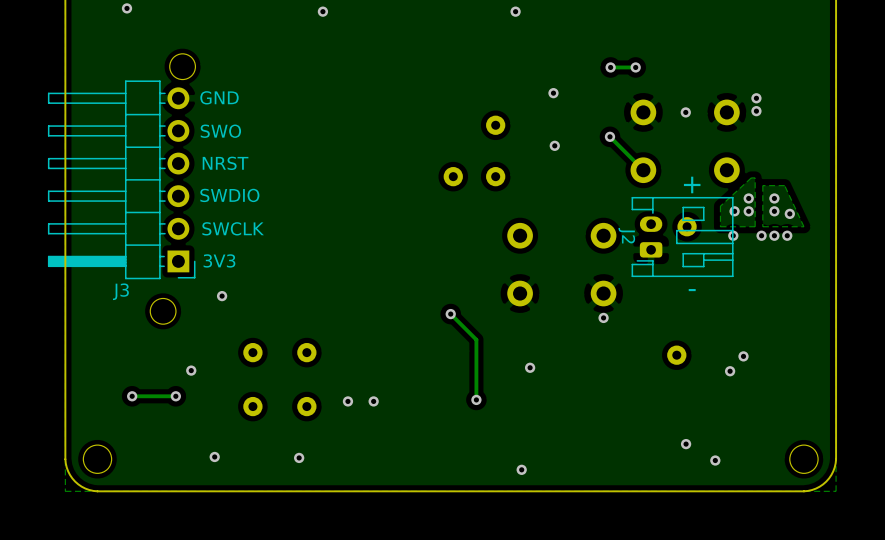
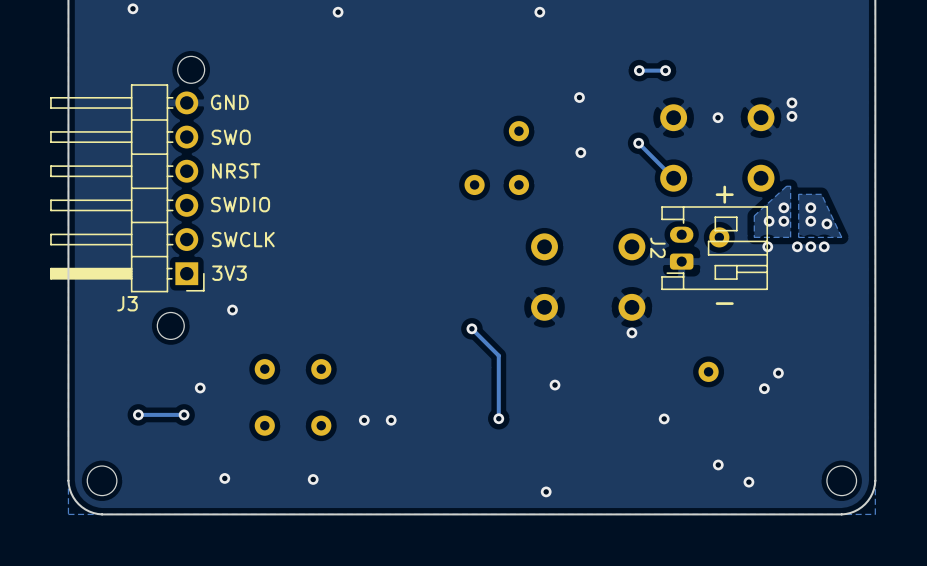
via: none -> (664, 418)

